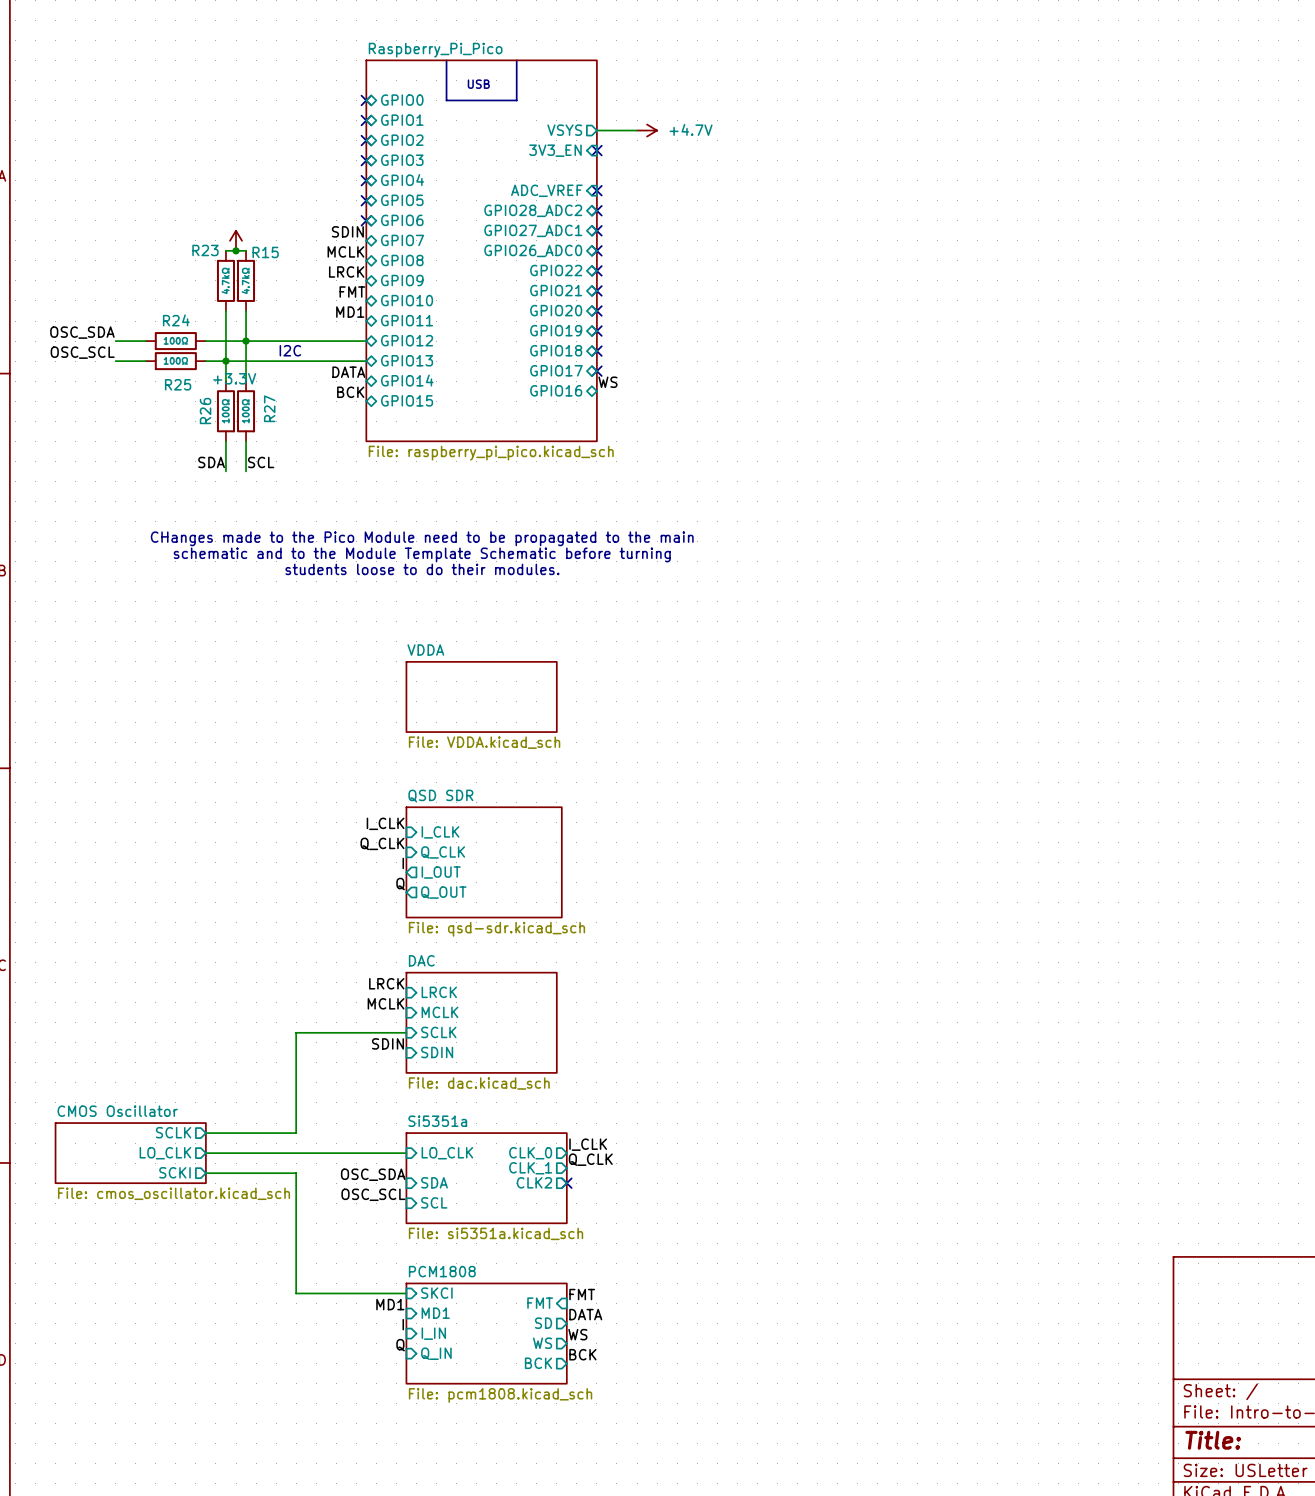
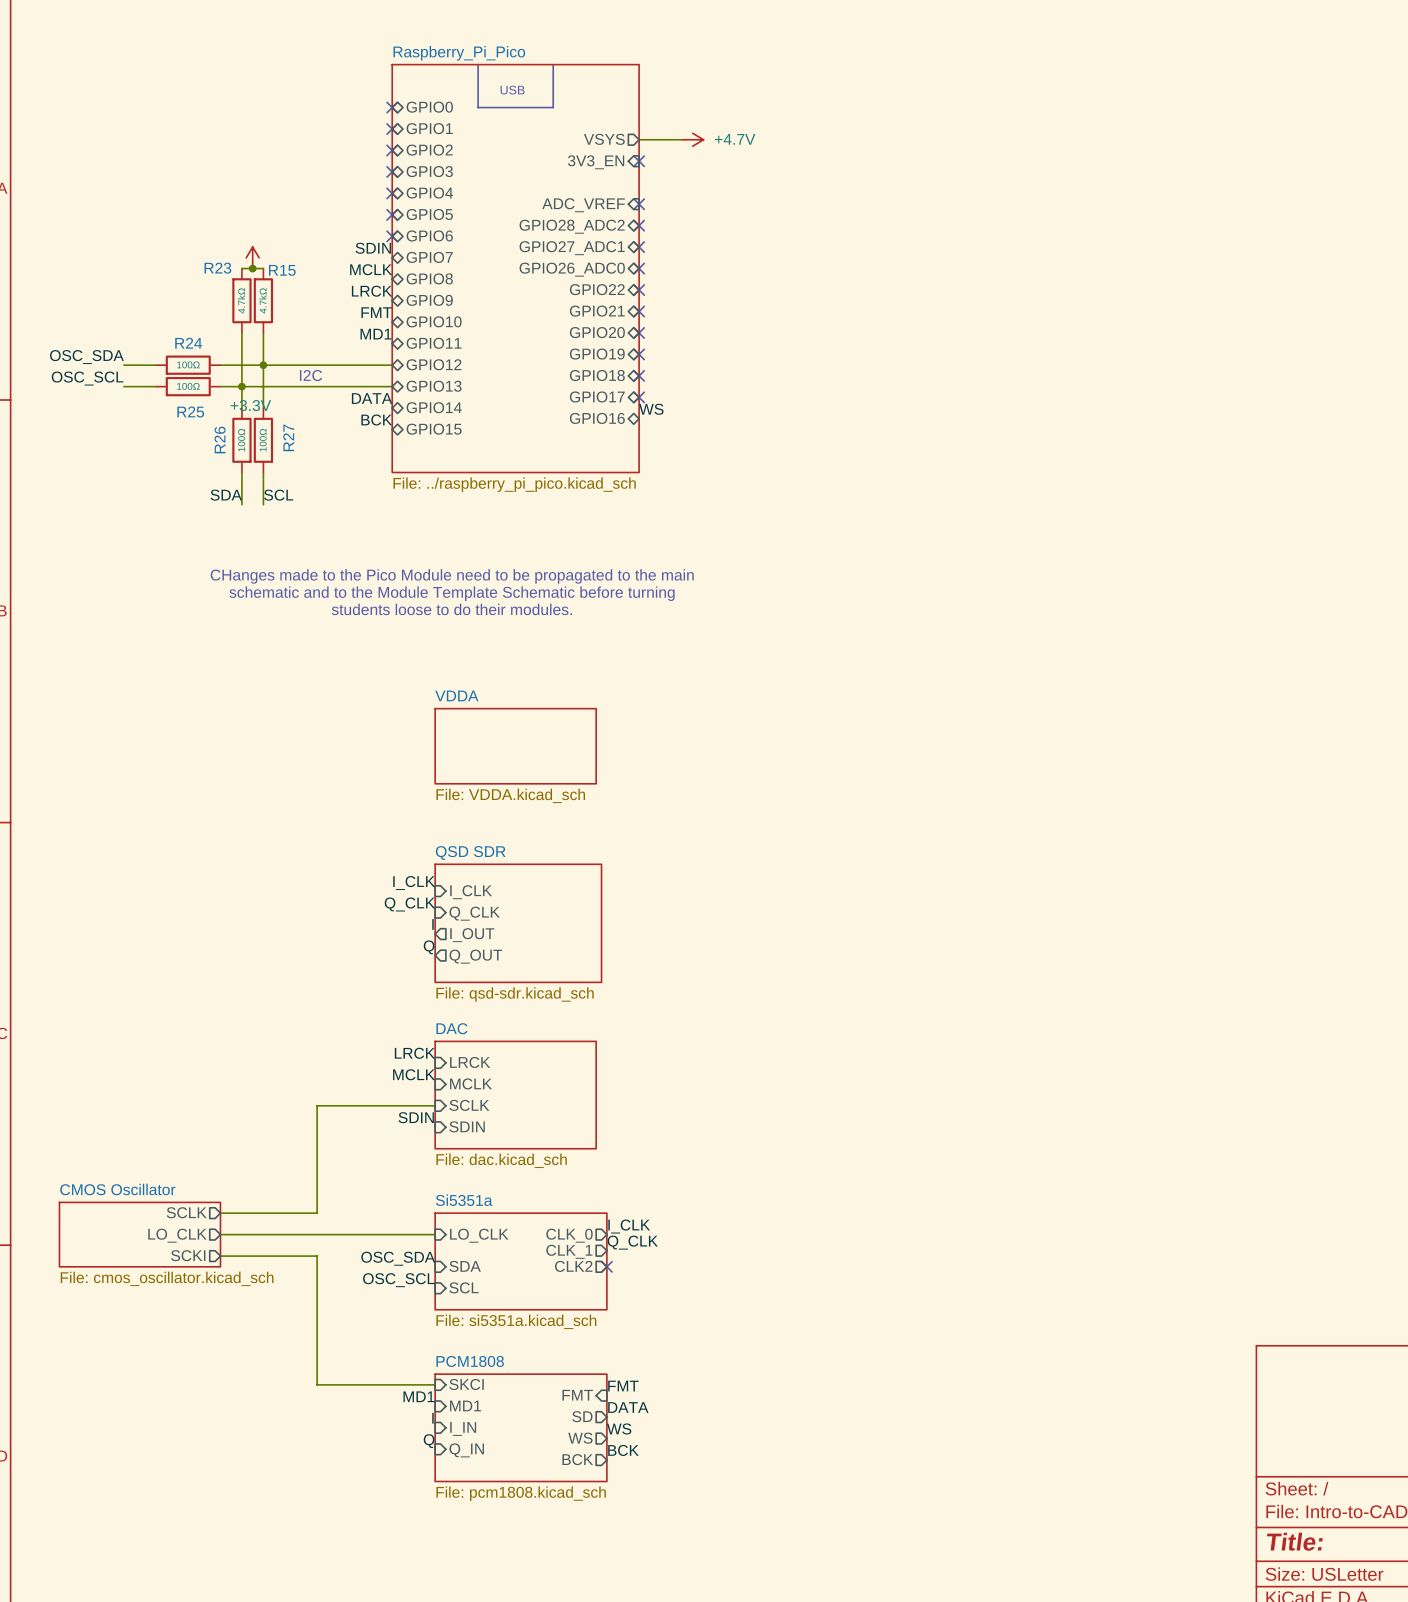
sheet Raspberry_Pi_Pico value: File: raspberry_pi_pico.kicad_sch (491, 453) -> File: ../raspberry_pi_pico.kicad_sch (514, 484)

